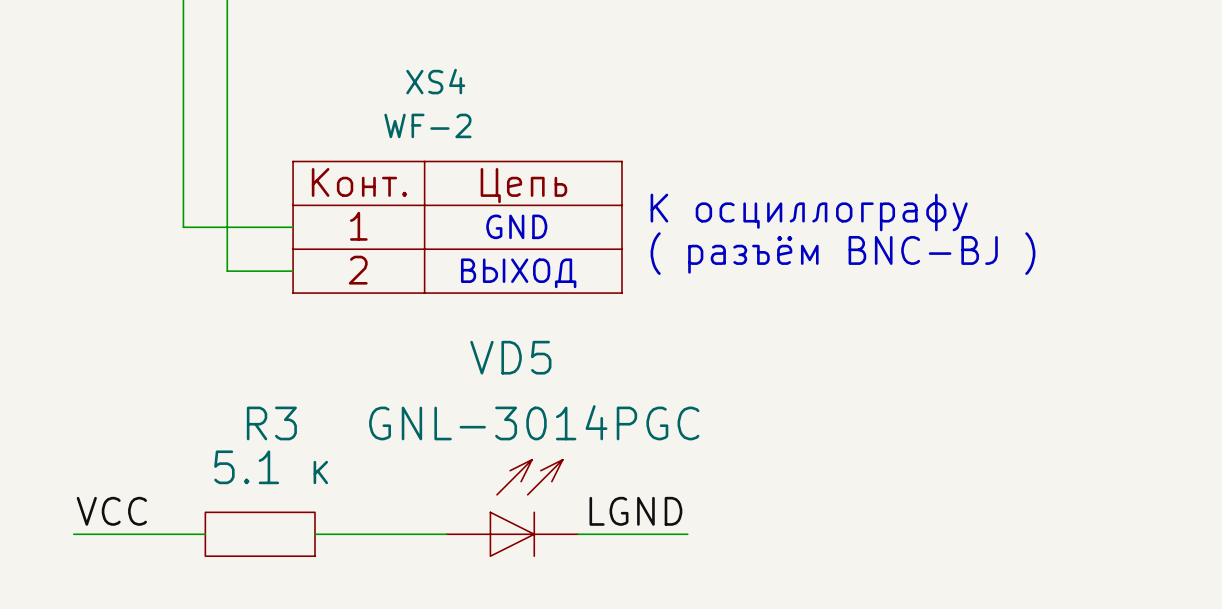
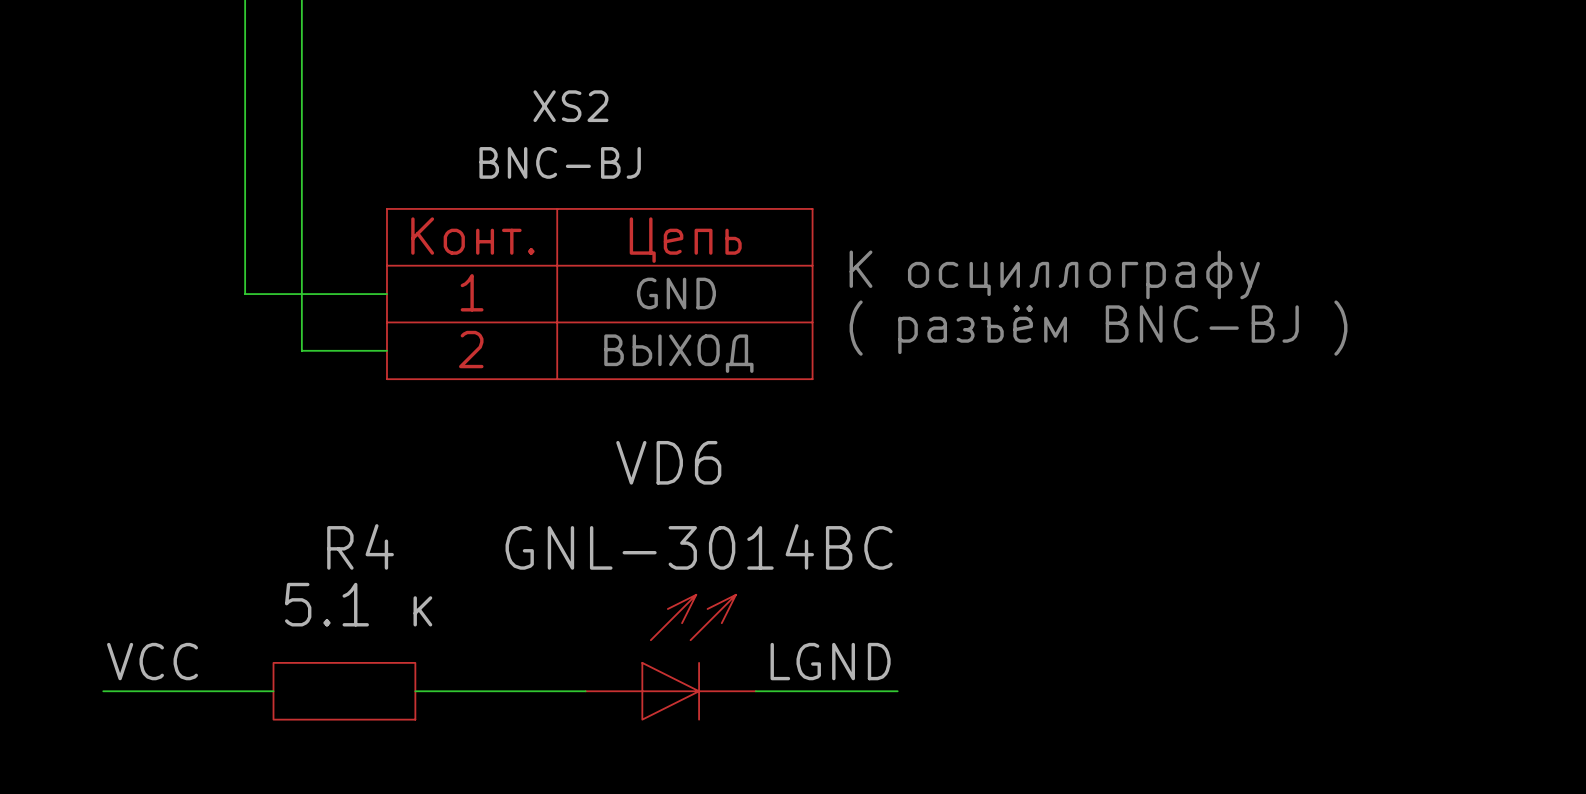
XS4 name: XS4 (435, 81) -> XS2 (570, 106)
XS4 value: WF-2 (427, 125) -> BNC-BJ (560, 162)
VD5 name: VD5 (510, 357) -> VD6 (668, 462)
VD5 value: GNL-3014PGC (534, 422) -> GNL-3014BC (699, 546)
R3 name: R3 (271, 423) -> R4 (360, 546)

